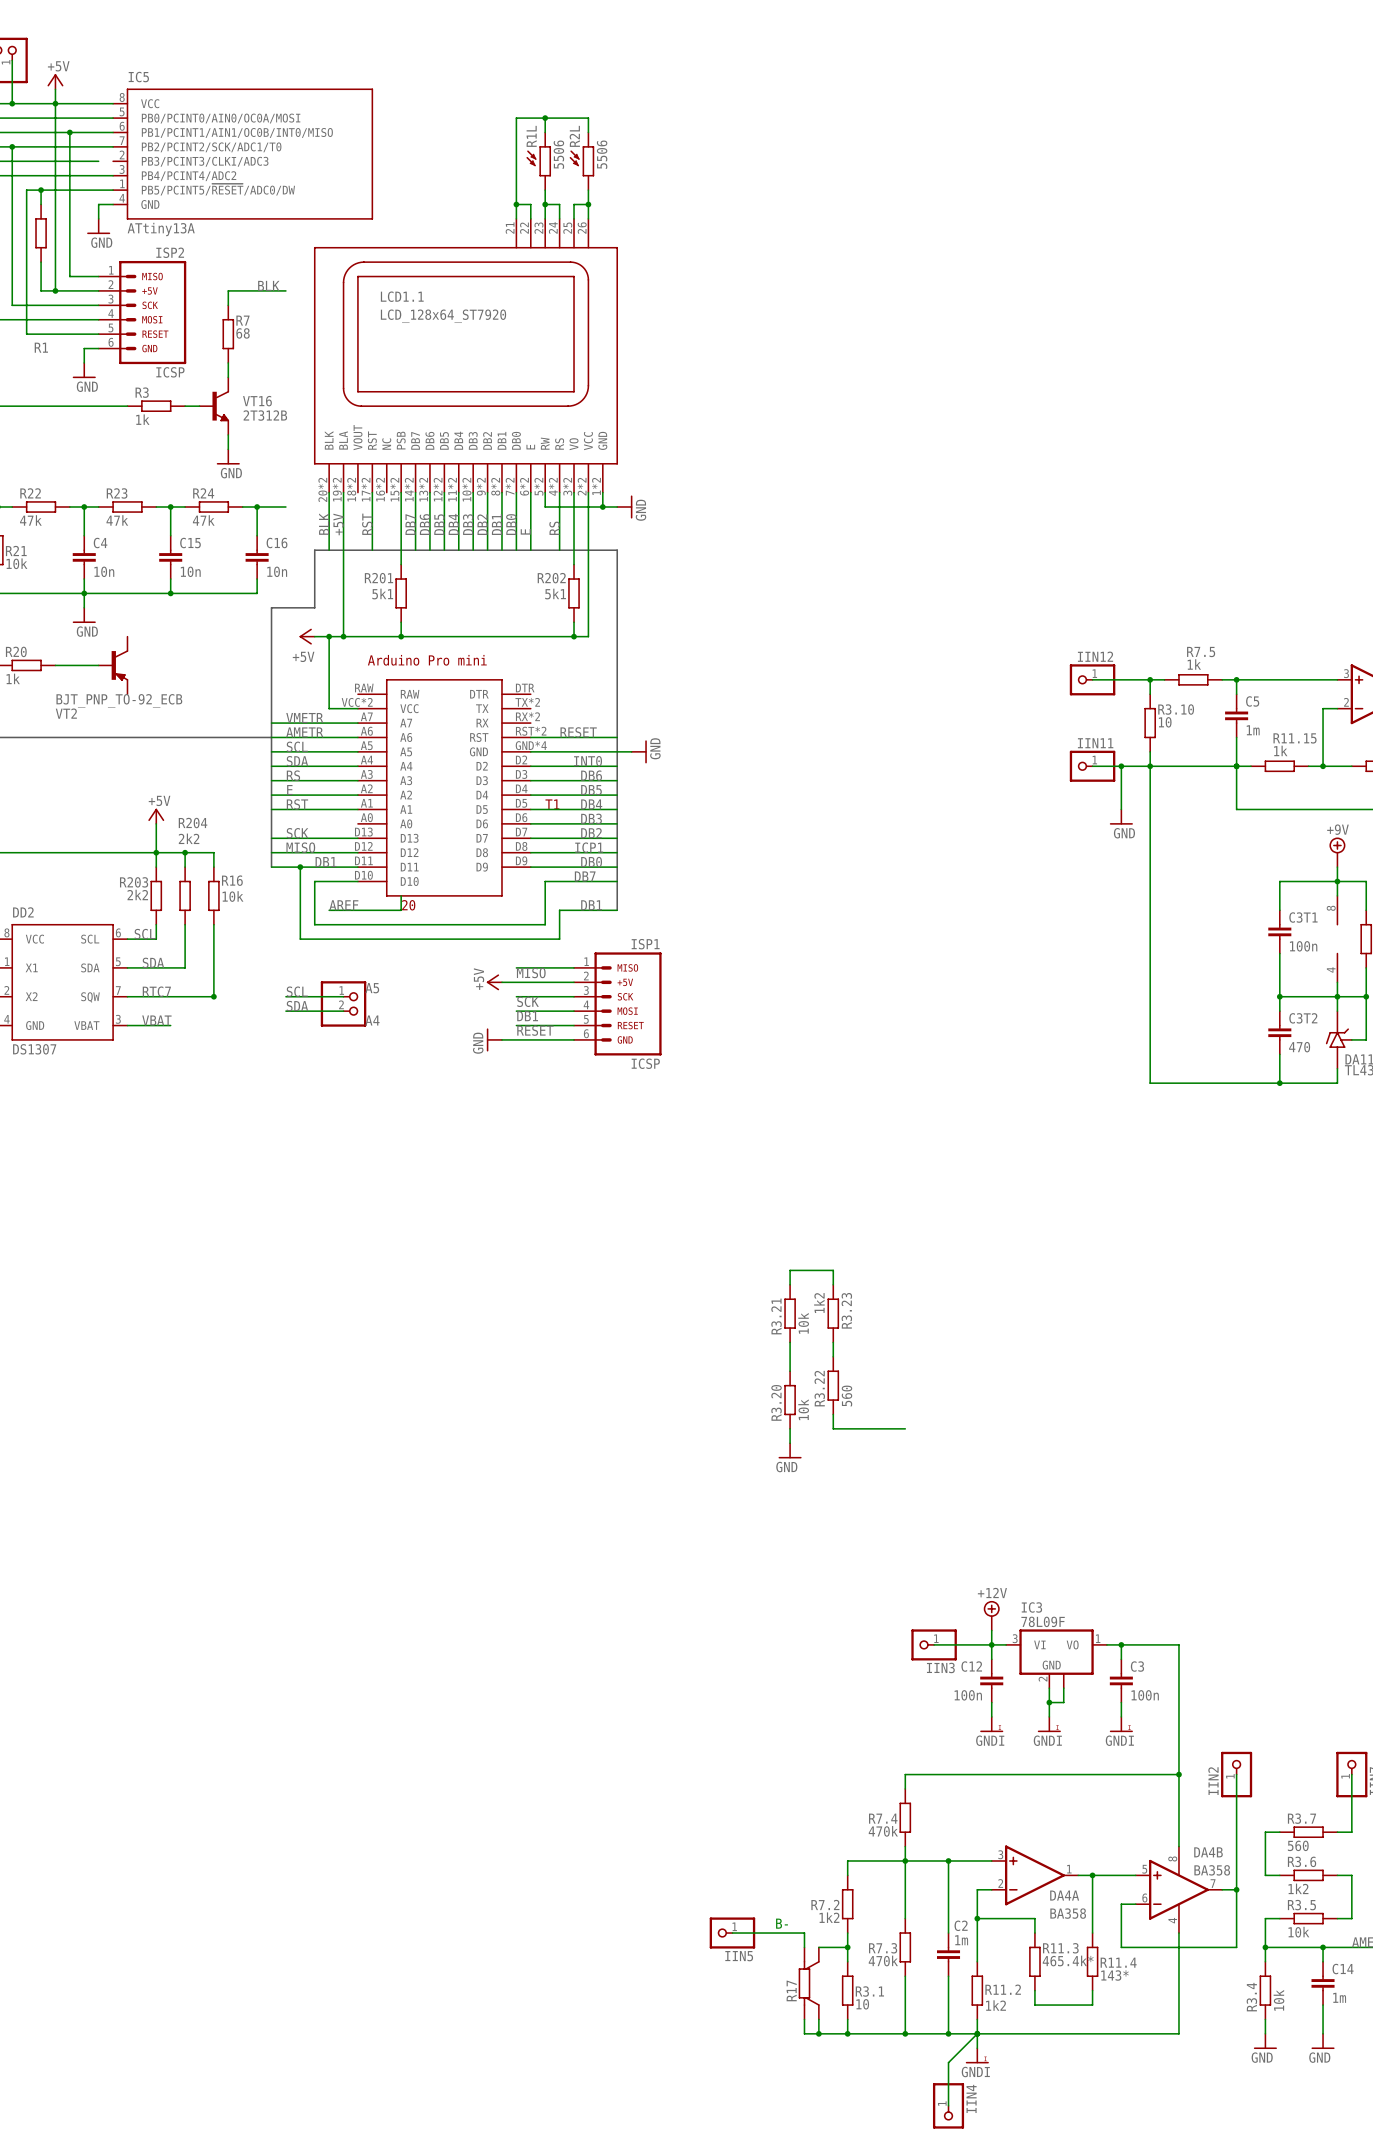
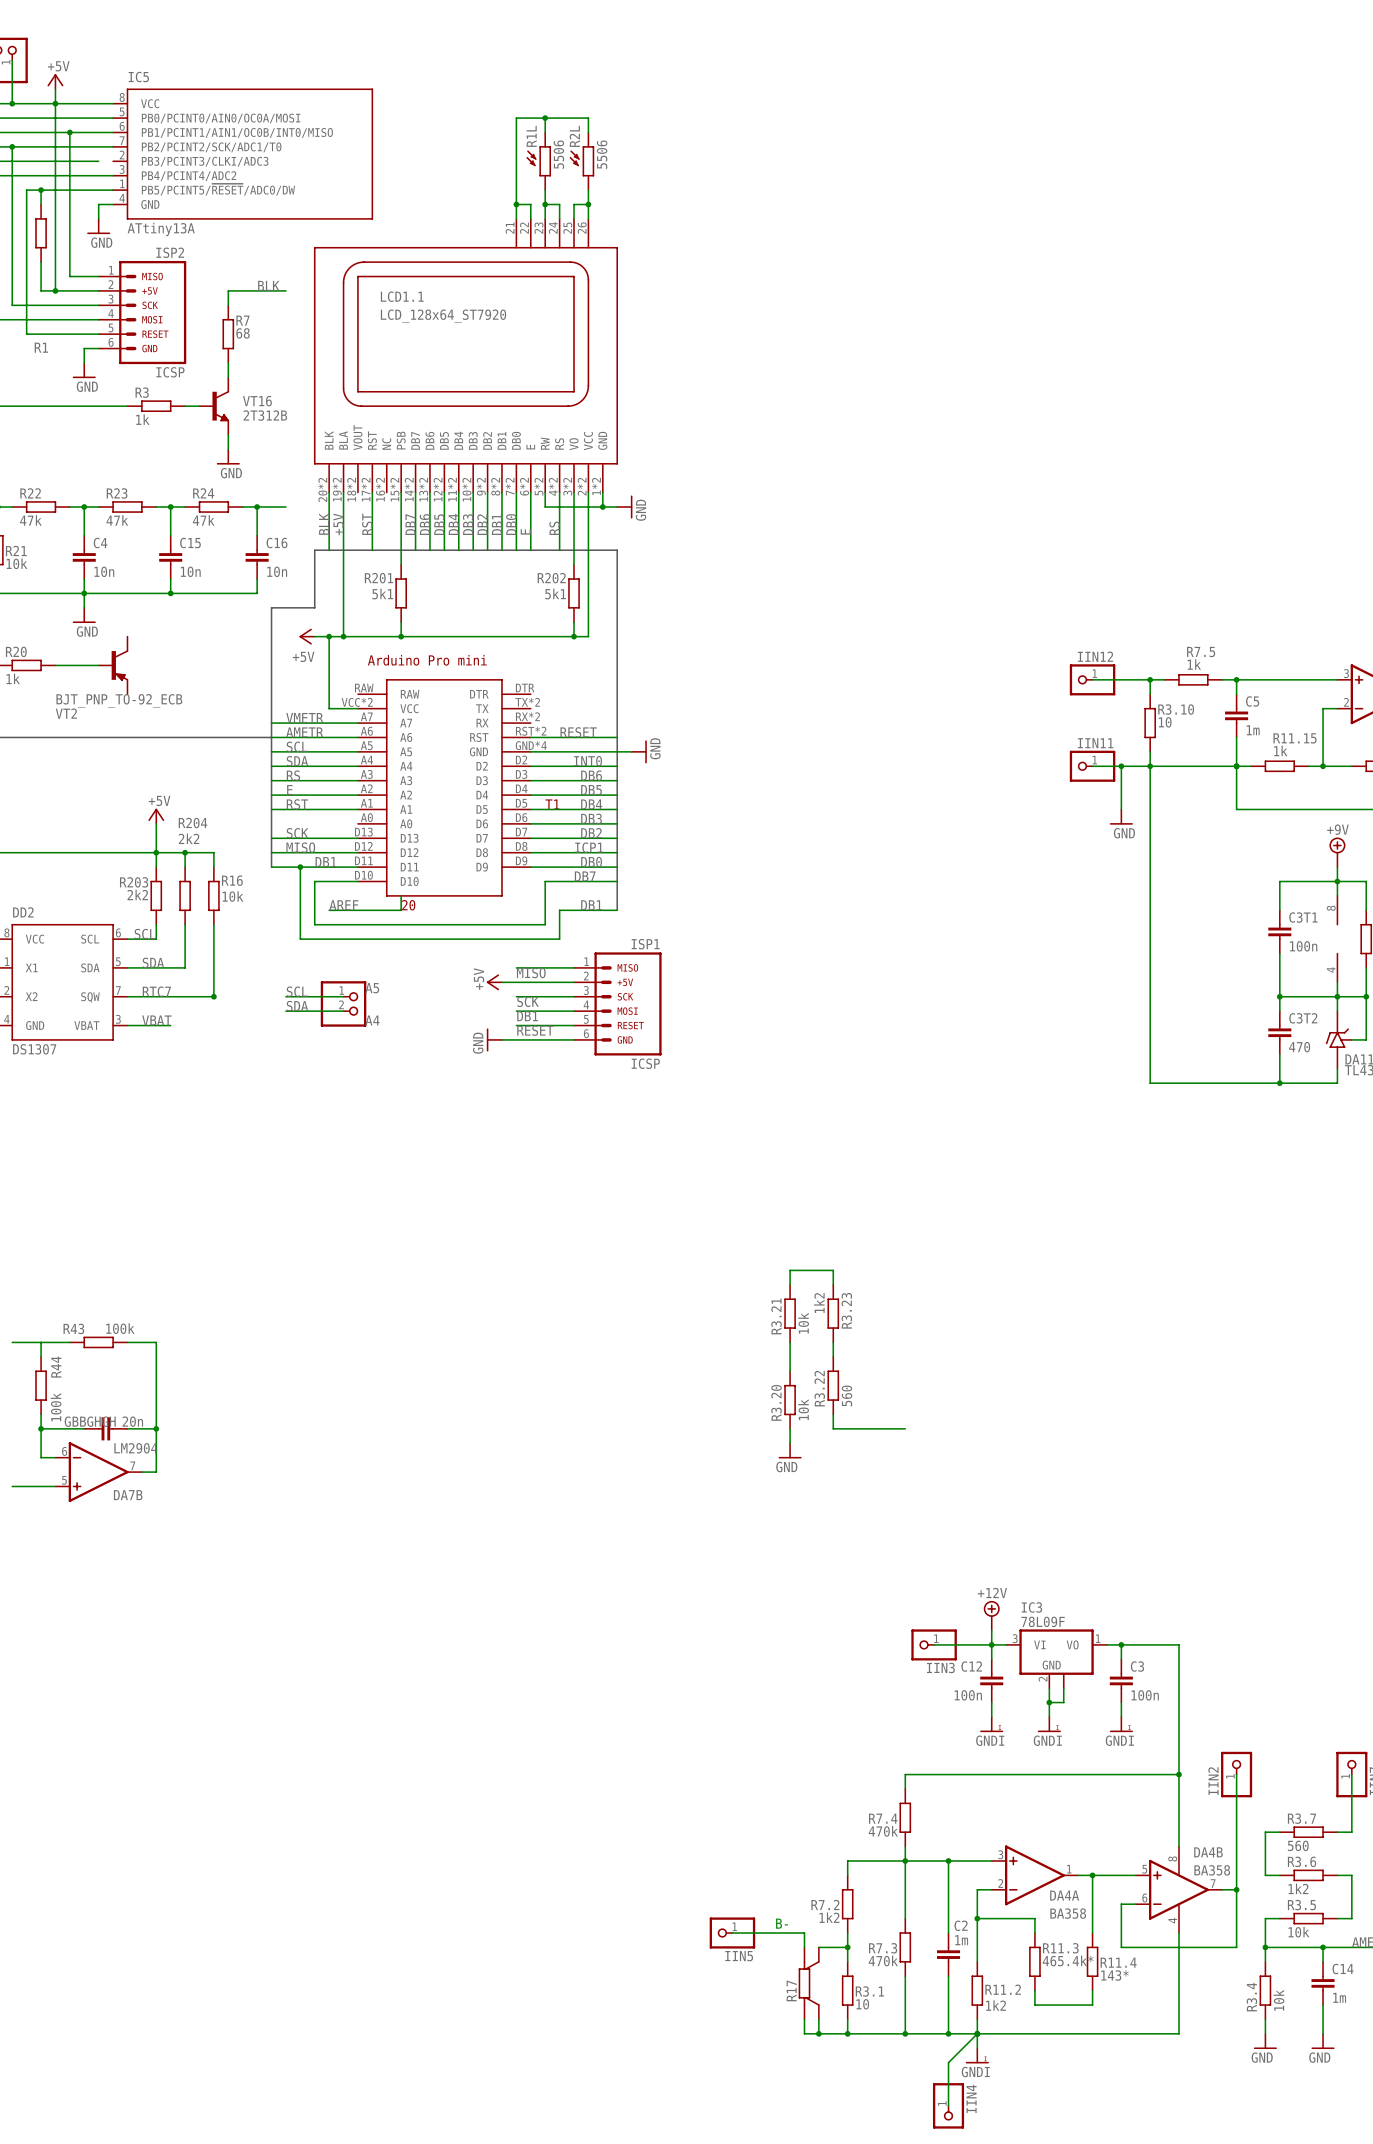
wire: none -> (12, 1342) (69, 1342)
wire: none -> (41, 1342) (41, 1356)
R43: none -> 100k (98, 1342)
wire: none -> (127, 1342) (156, 1342) (156, 1472) (141, 1472)
R44: none -> 100k (41, 1385)
wire: none -> (41, 1414) (41, 1457) (55, 1457)
wire: none -> (41, 1428) (84, 1428)
junction: none -> (41, 1428)
GBBGHGH: none -> 20n (105, 1428)
wire: none -> (127, 1428) (156, 1428)
junction: none -> (156, 1428)
DA7B: none -> LM2904 (98, 1472)
wire: none -> (12, 1486) (55, 1486)

